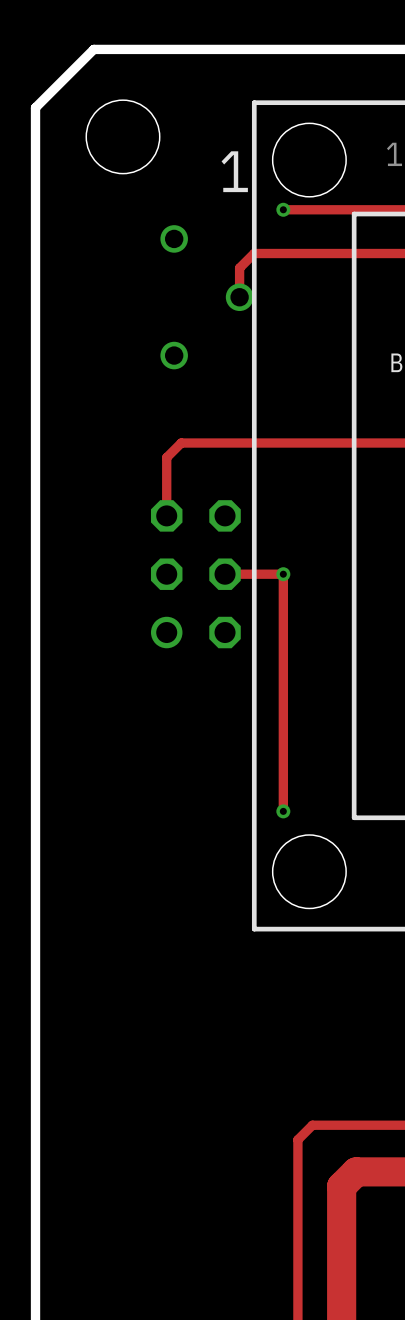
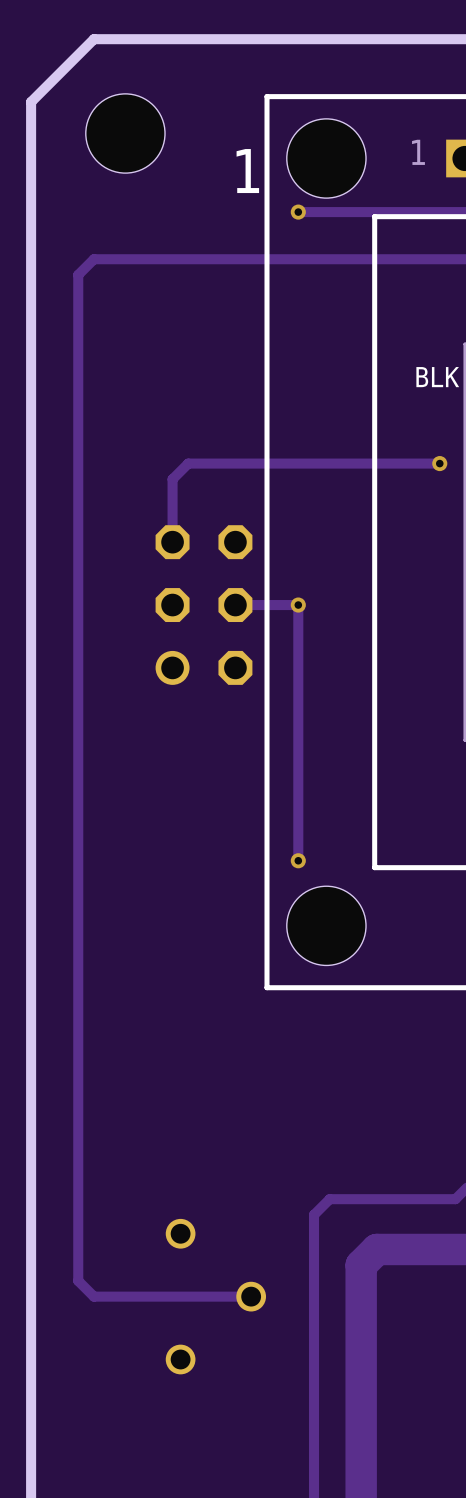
track: (254, 253) (239, 268) (239, 297) -> (266, 259) (93, 259) (78, 274) (78, 1280) (93, 1296) (251, 1296)
part: (206, 297) -> none
part: none -> (215, 1296)

